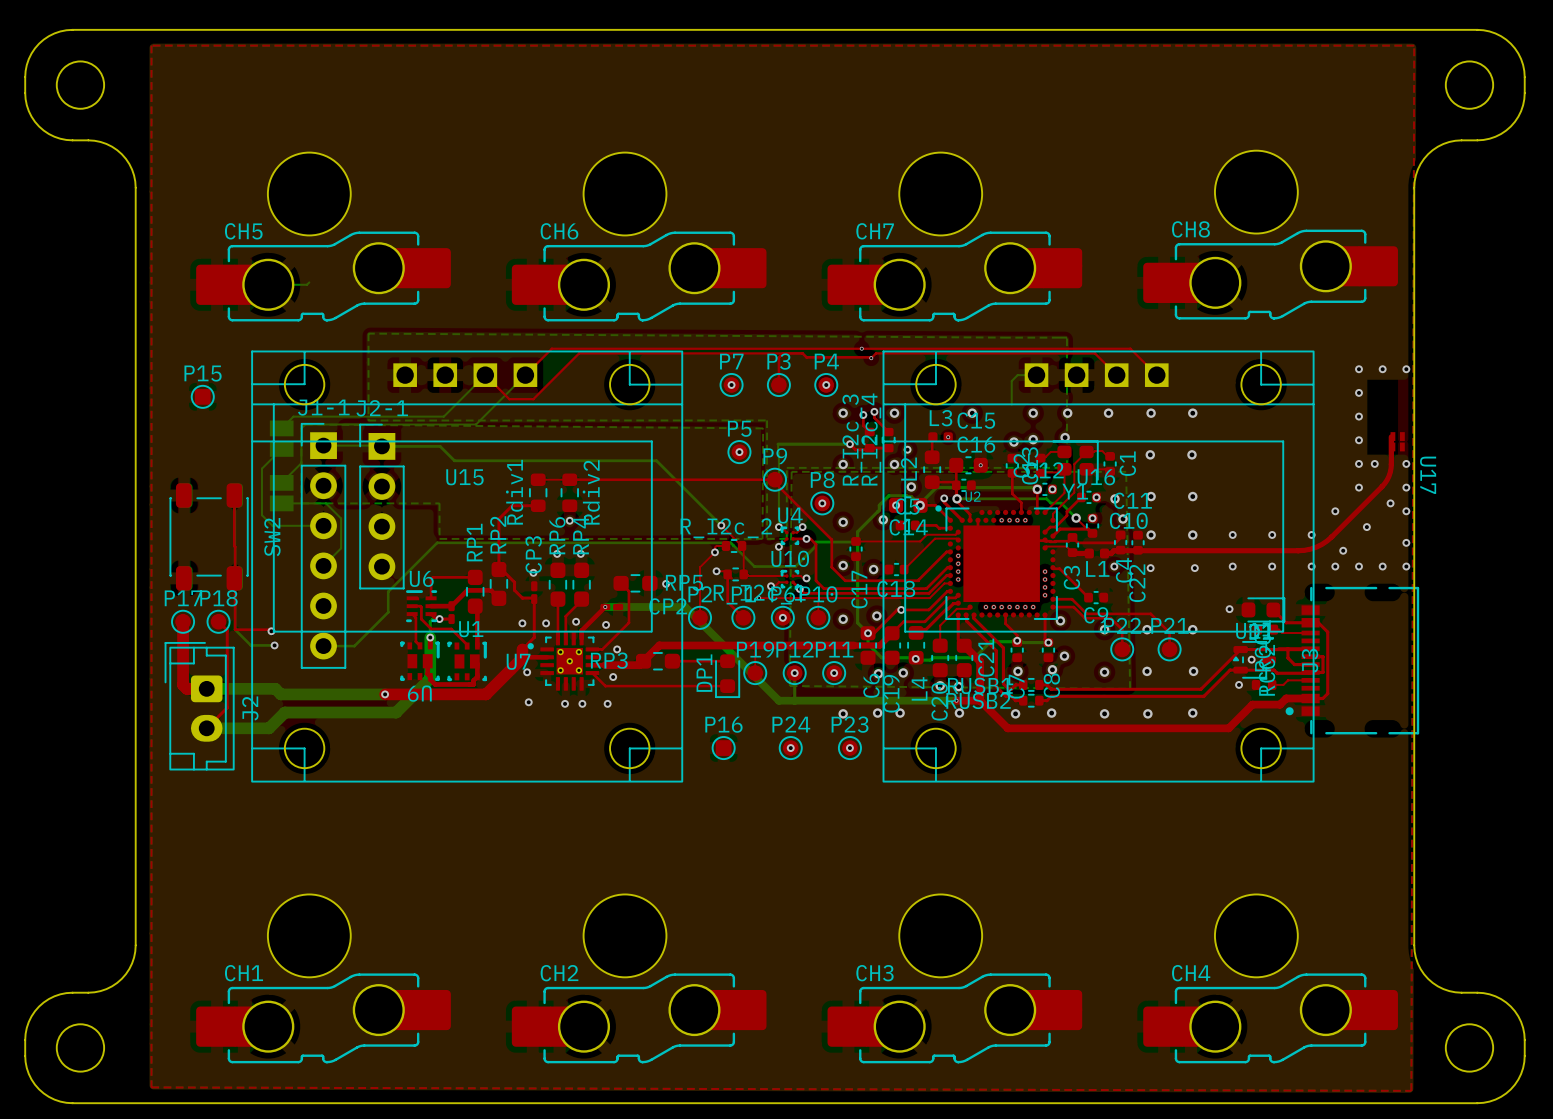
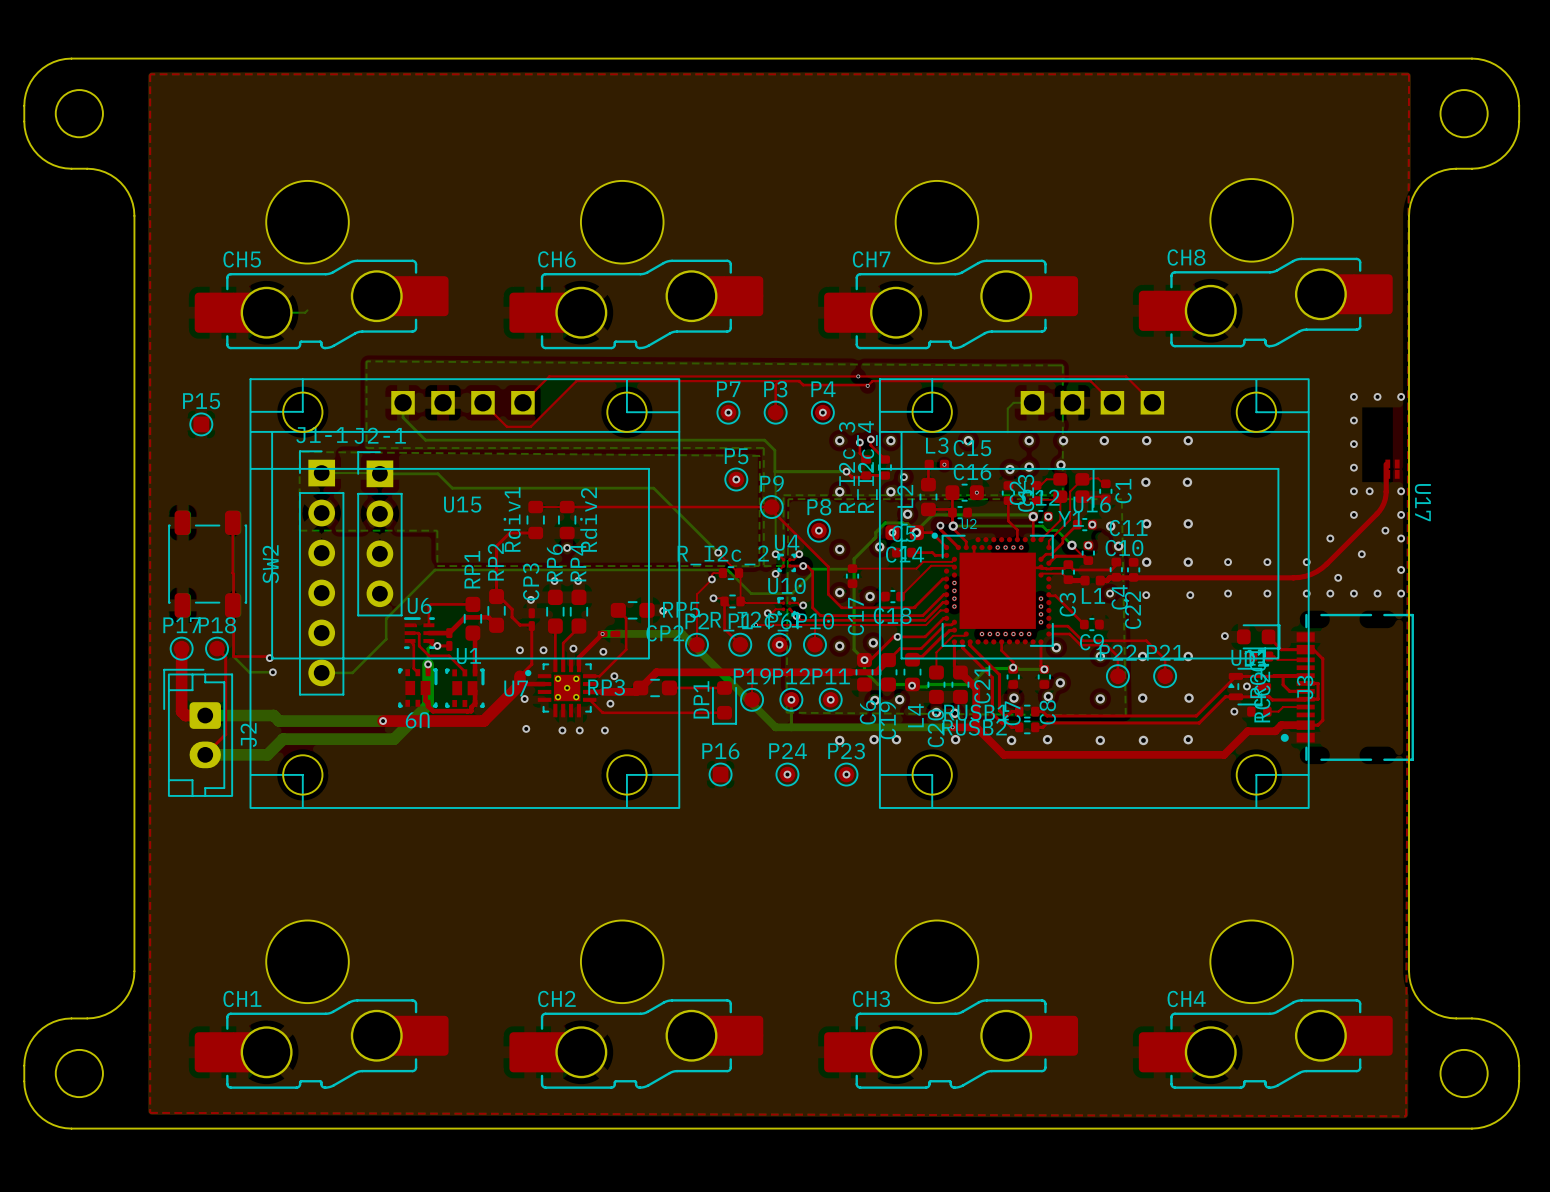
bottom track: none -> (403, 402) (403, 417) (425, 440) (764, 440) (774, 450) (774, 471)
bottom track: (485, 375) (443, 416) (293, 416) (281, 428) -> none
bottom track: (525, 375) (476, 424) (305, 424) (301, 428) (301, 463) (281, 482) -> none
part: (281, 438) -> none
bottom track: (281, 448) (261, 468) (261, 515) (272, 525) (323, 525) -> none
part: (281, 493) -> none
bottom track: (281, 503) (325, 503) (341, 518) (341, 548) (323, 565) -> none

